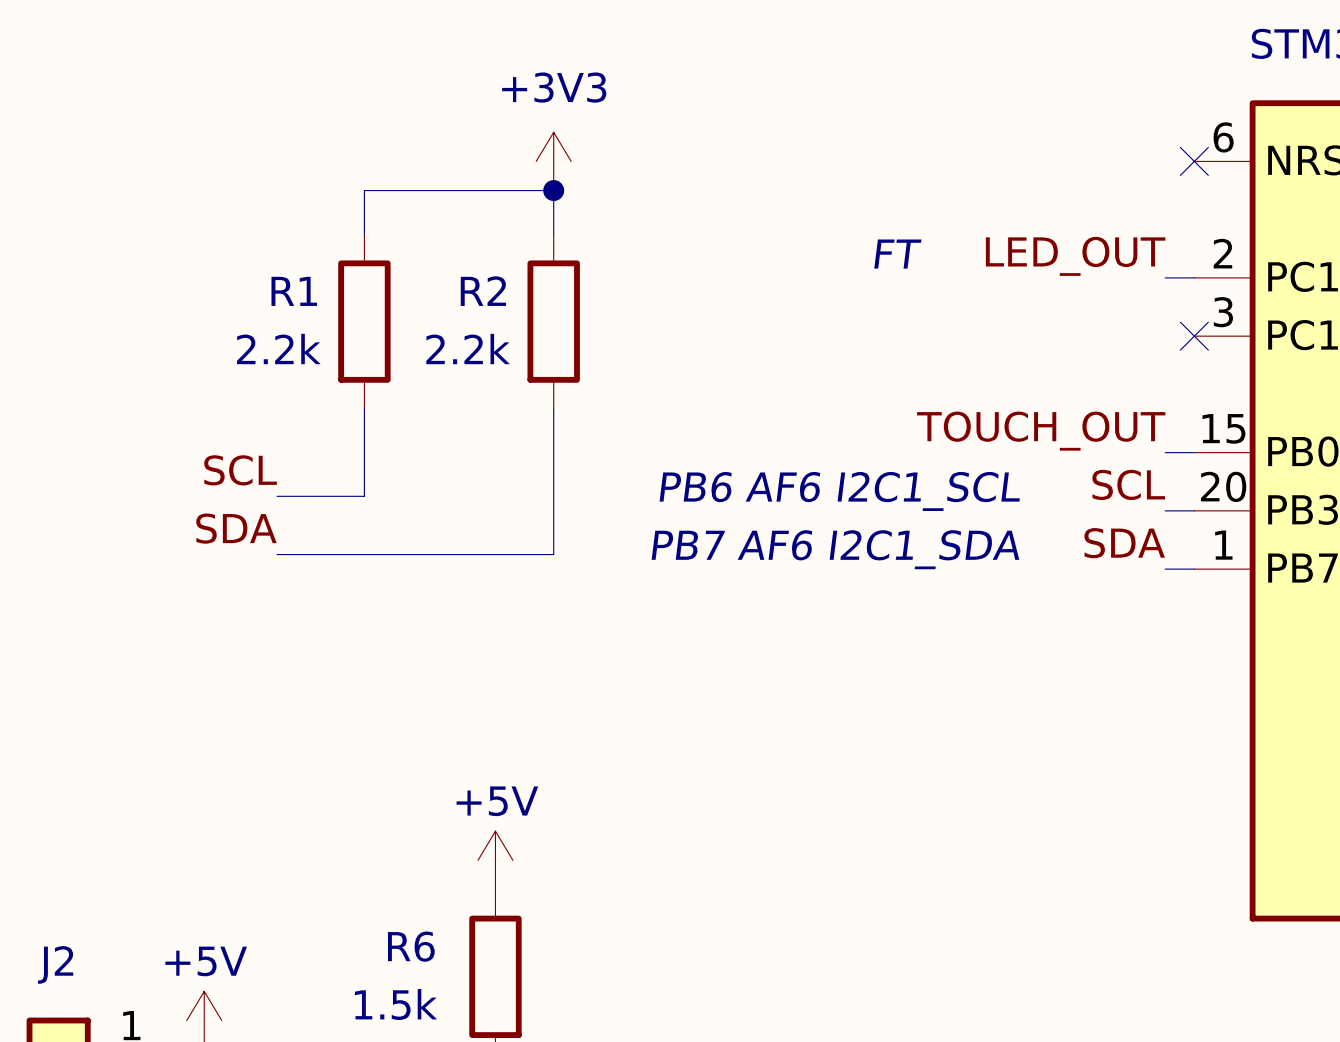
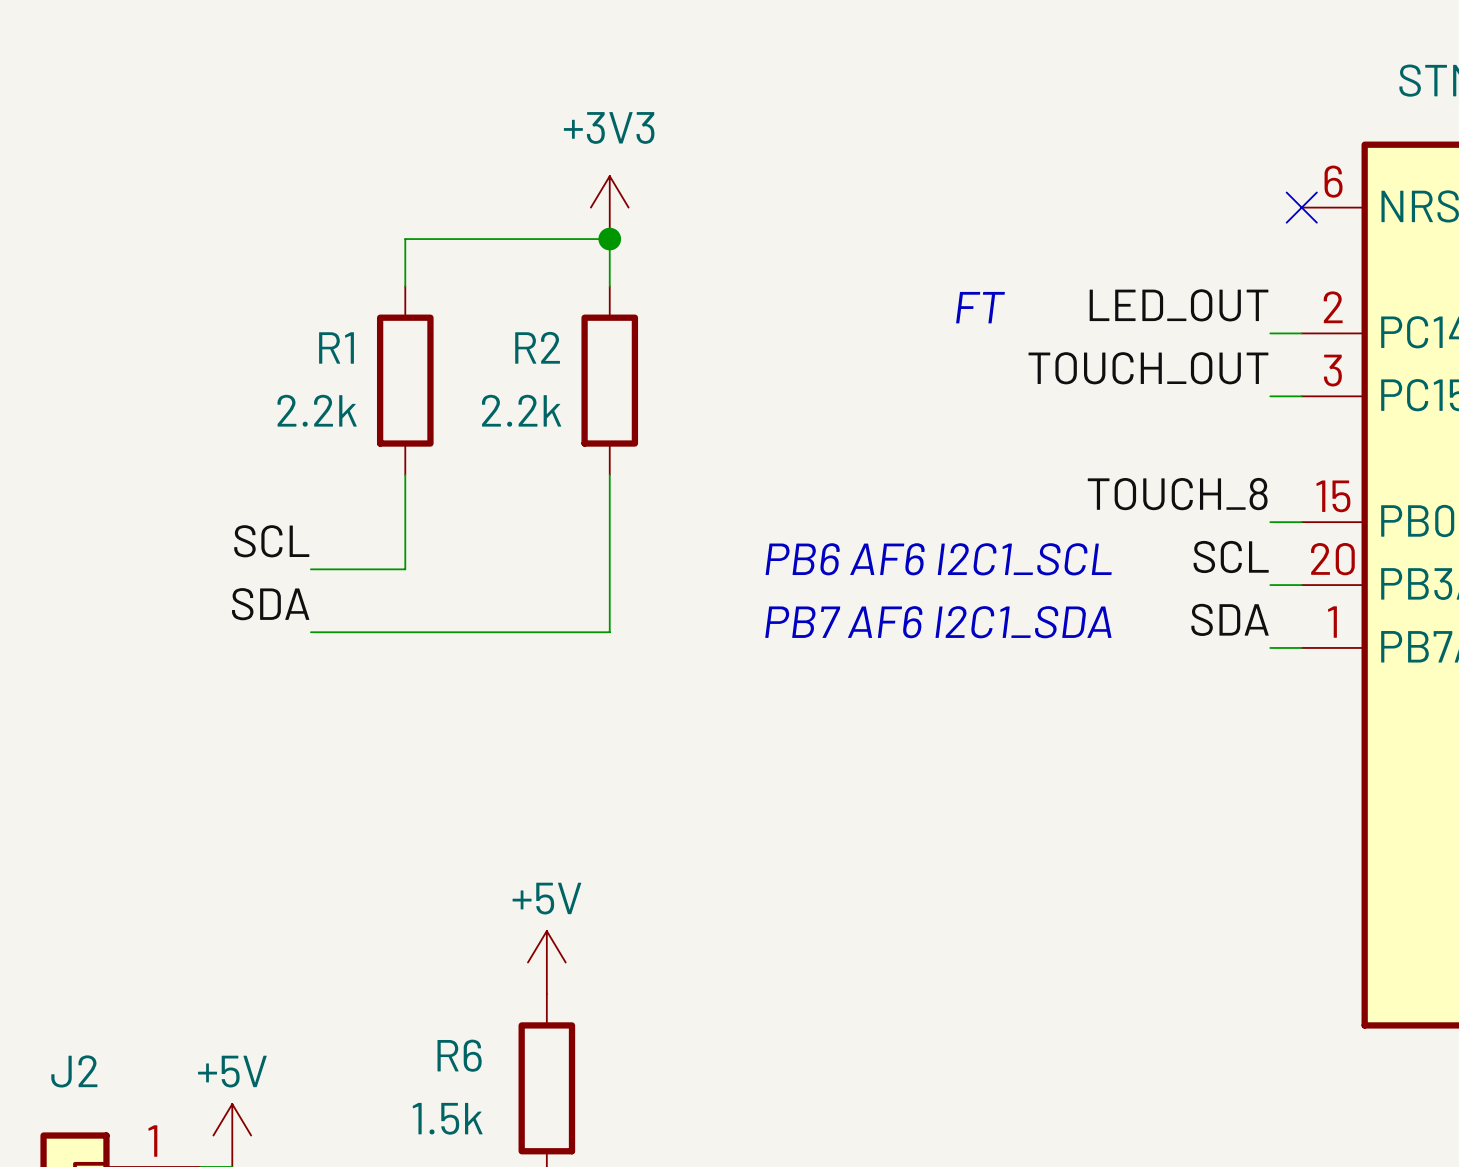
label: none -> TOUCH_OUT (1148, 368)
wire: none -> (1270, 396) (1301, 396)
no-connect mark: (1194, 336) -> none
label: TOUCH_OUT (1041, 431) -> TOUCH_8 (1177, 494)

